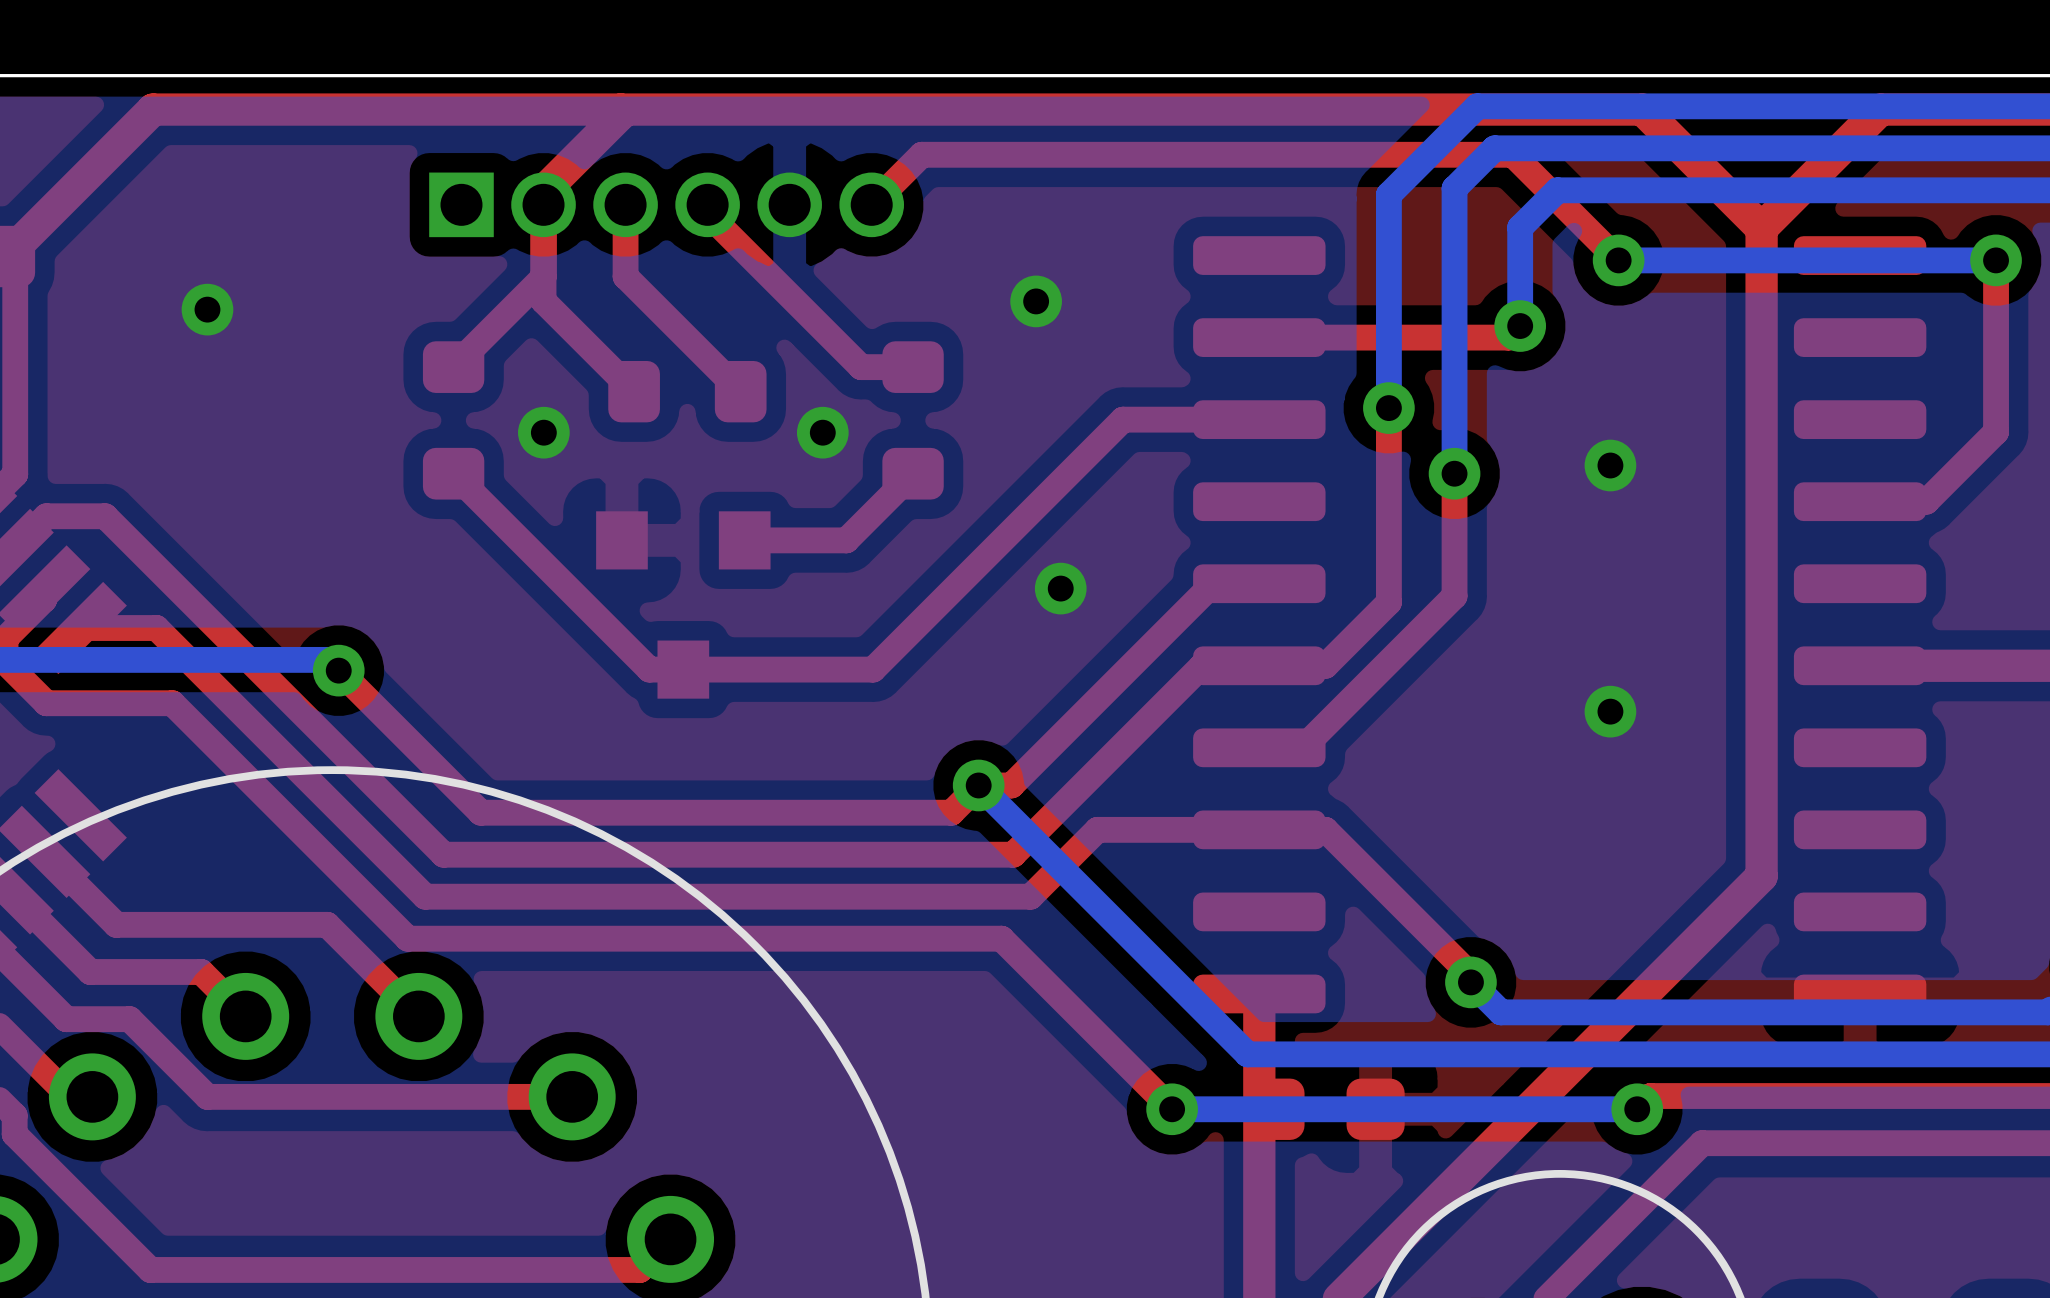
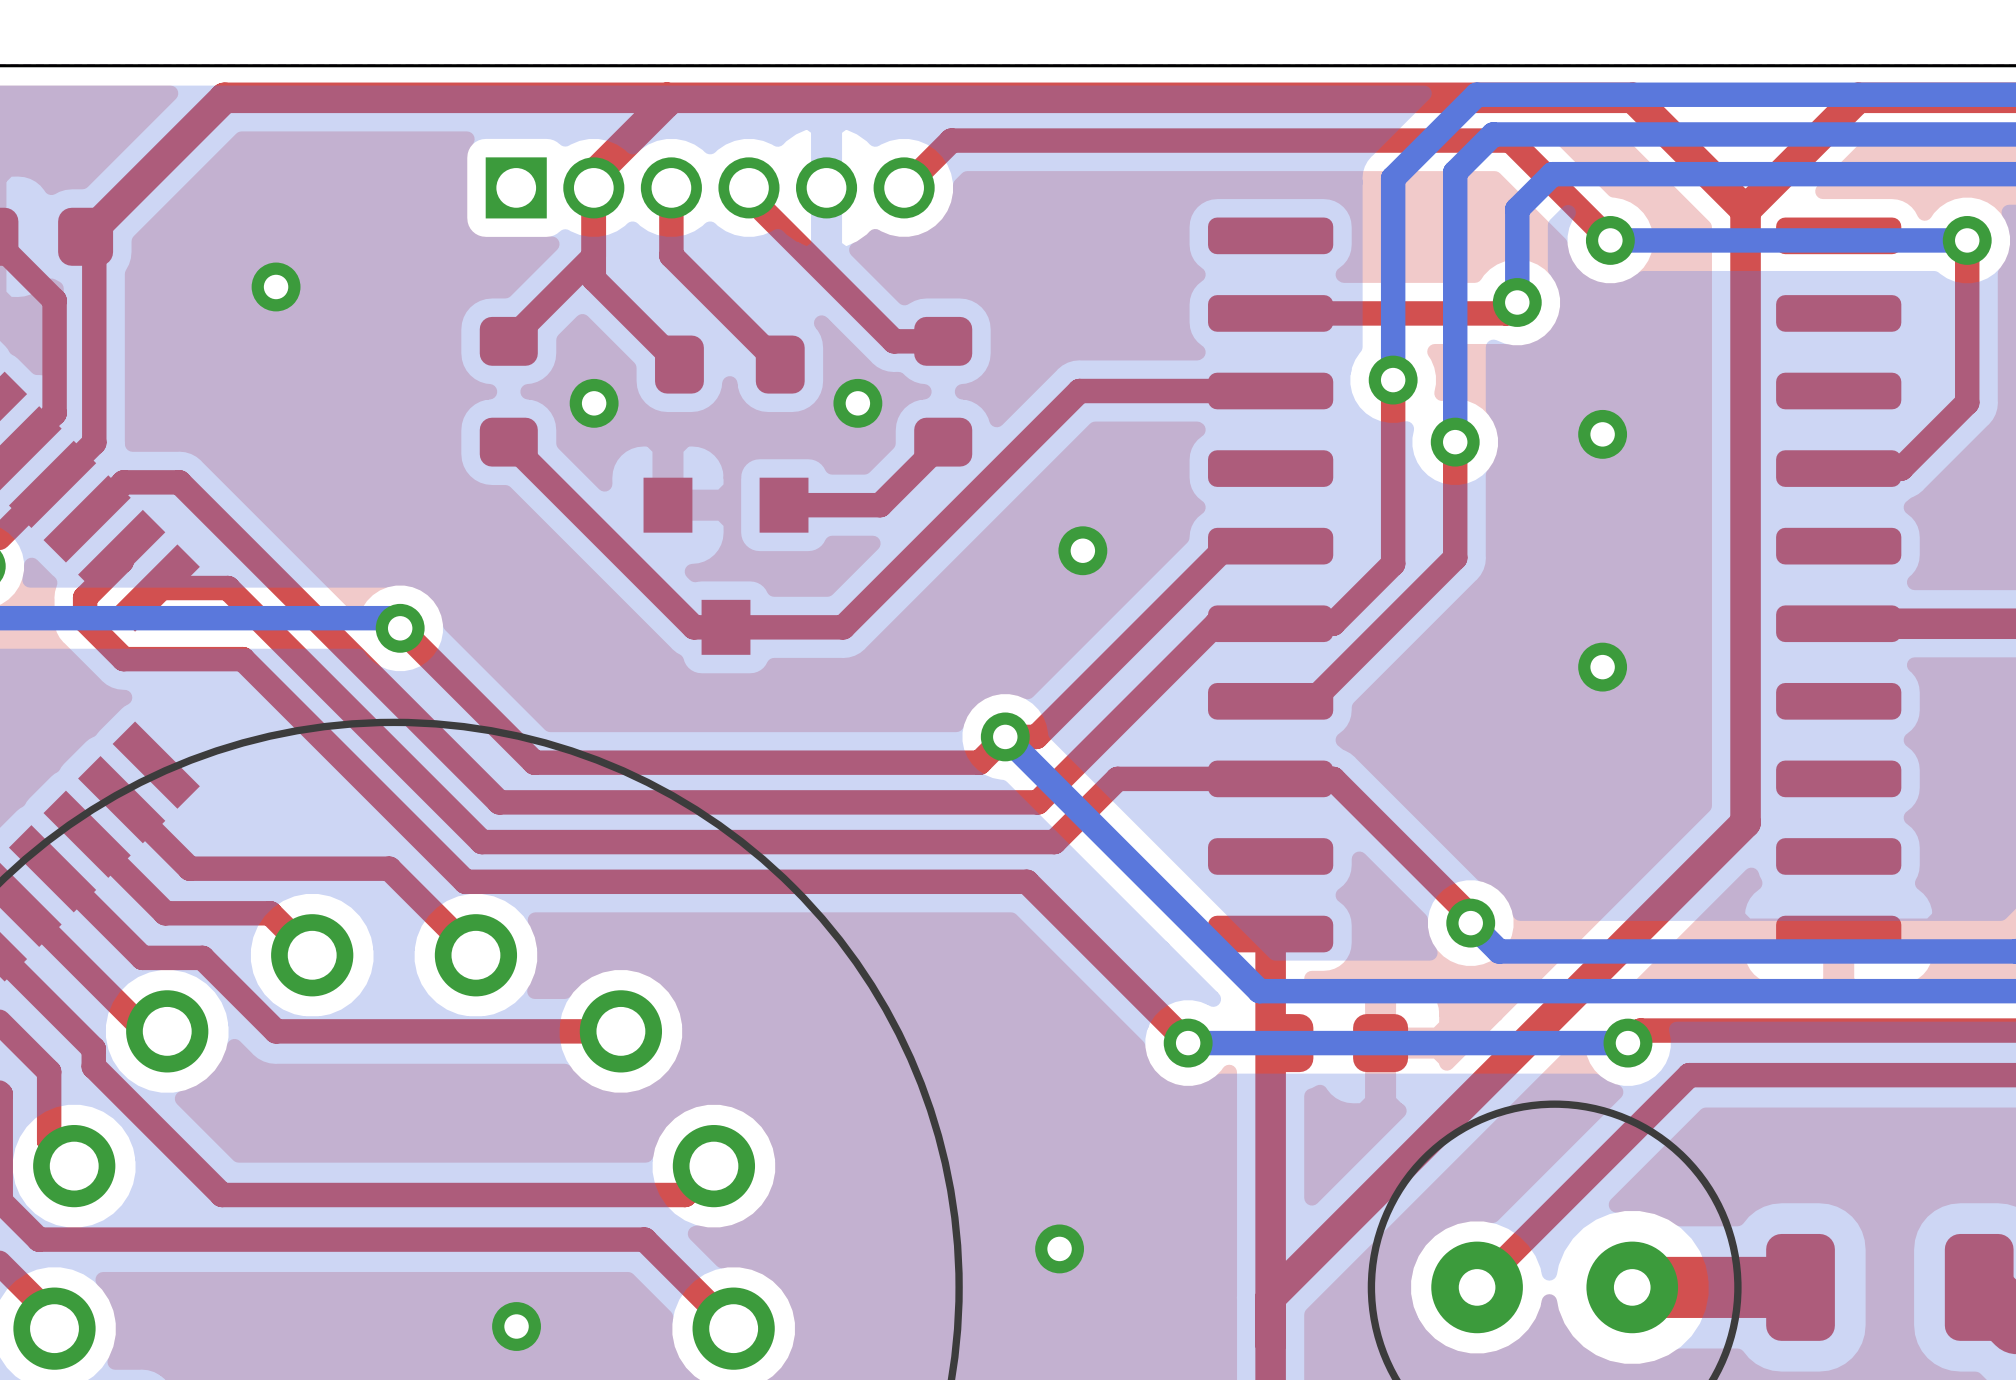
via: (1036, 301) -> none
top track: (1123, 419) (873, 669) (807, 669) -> (1141, 391) (1079, 391) (843, 627)

